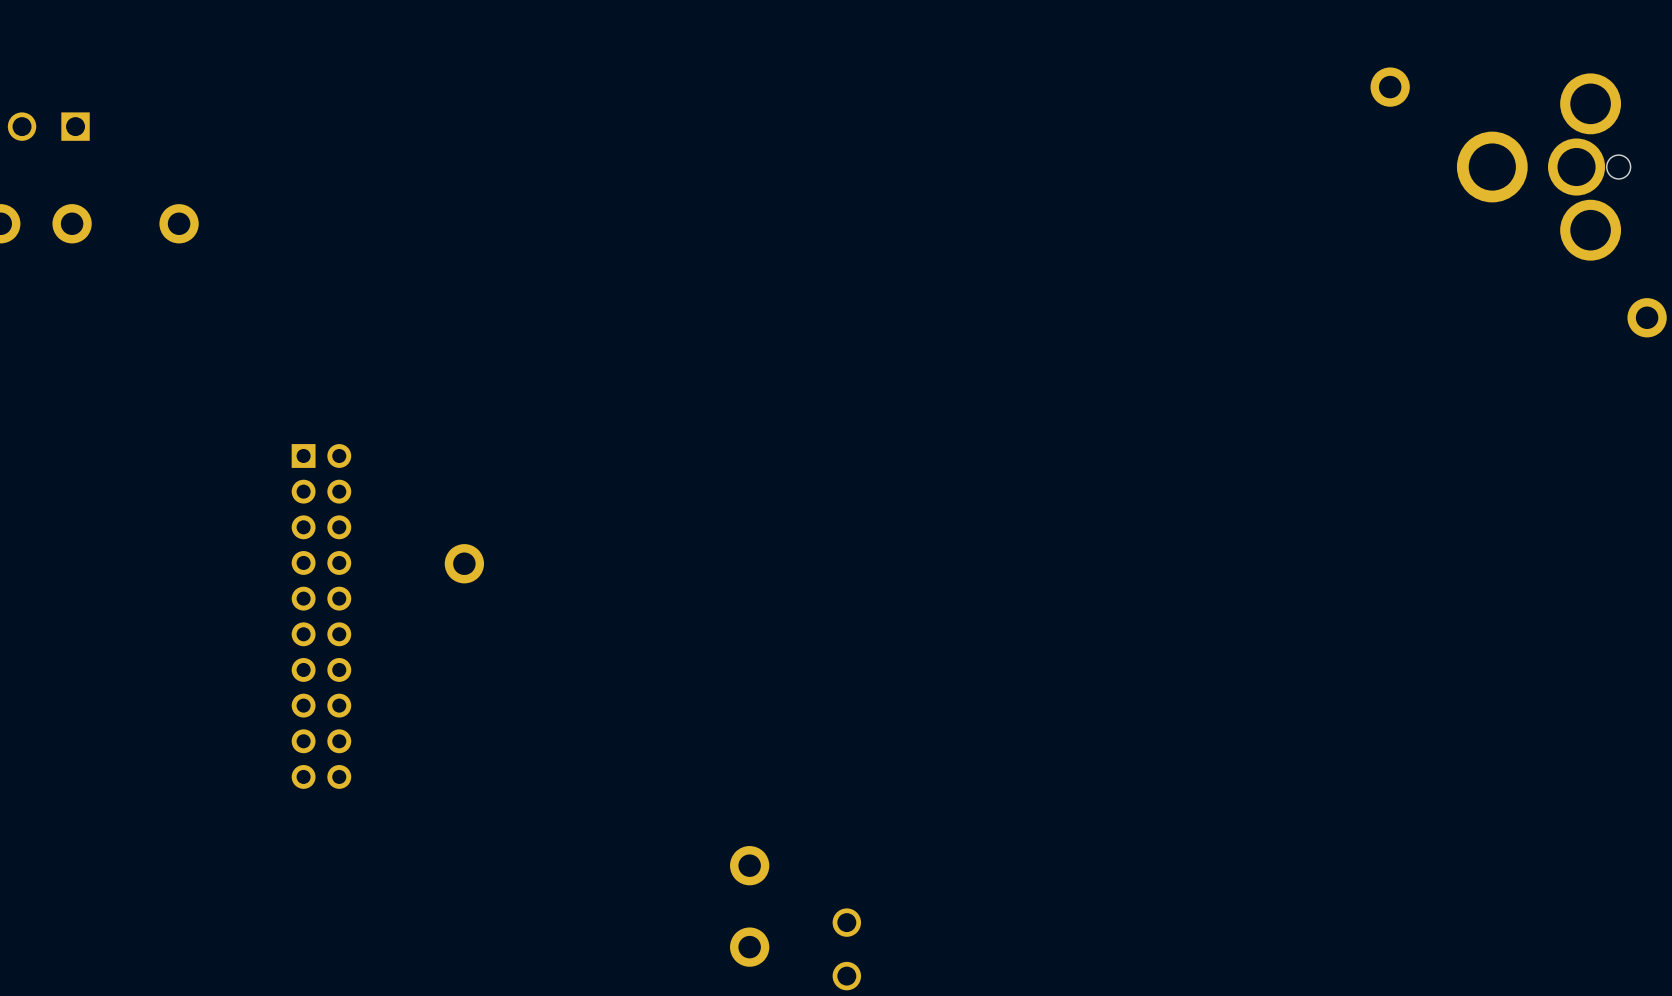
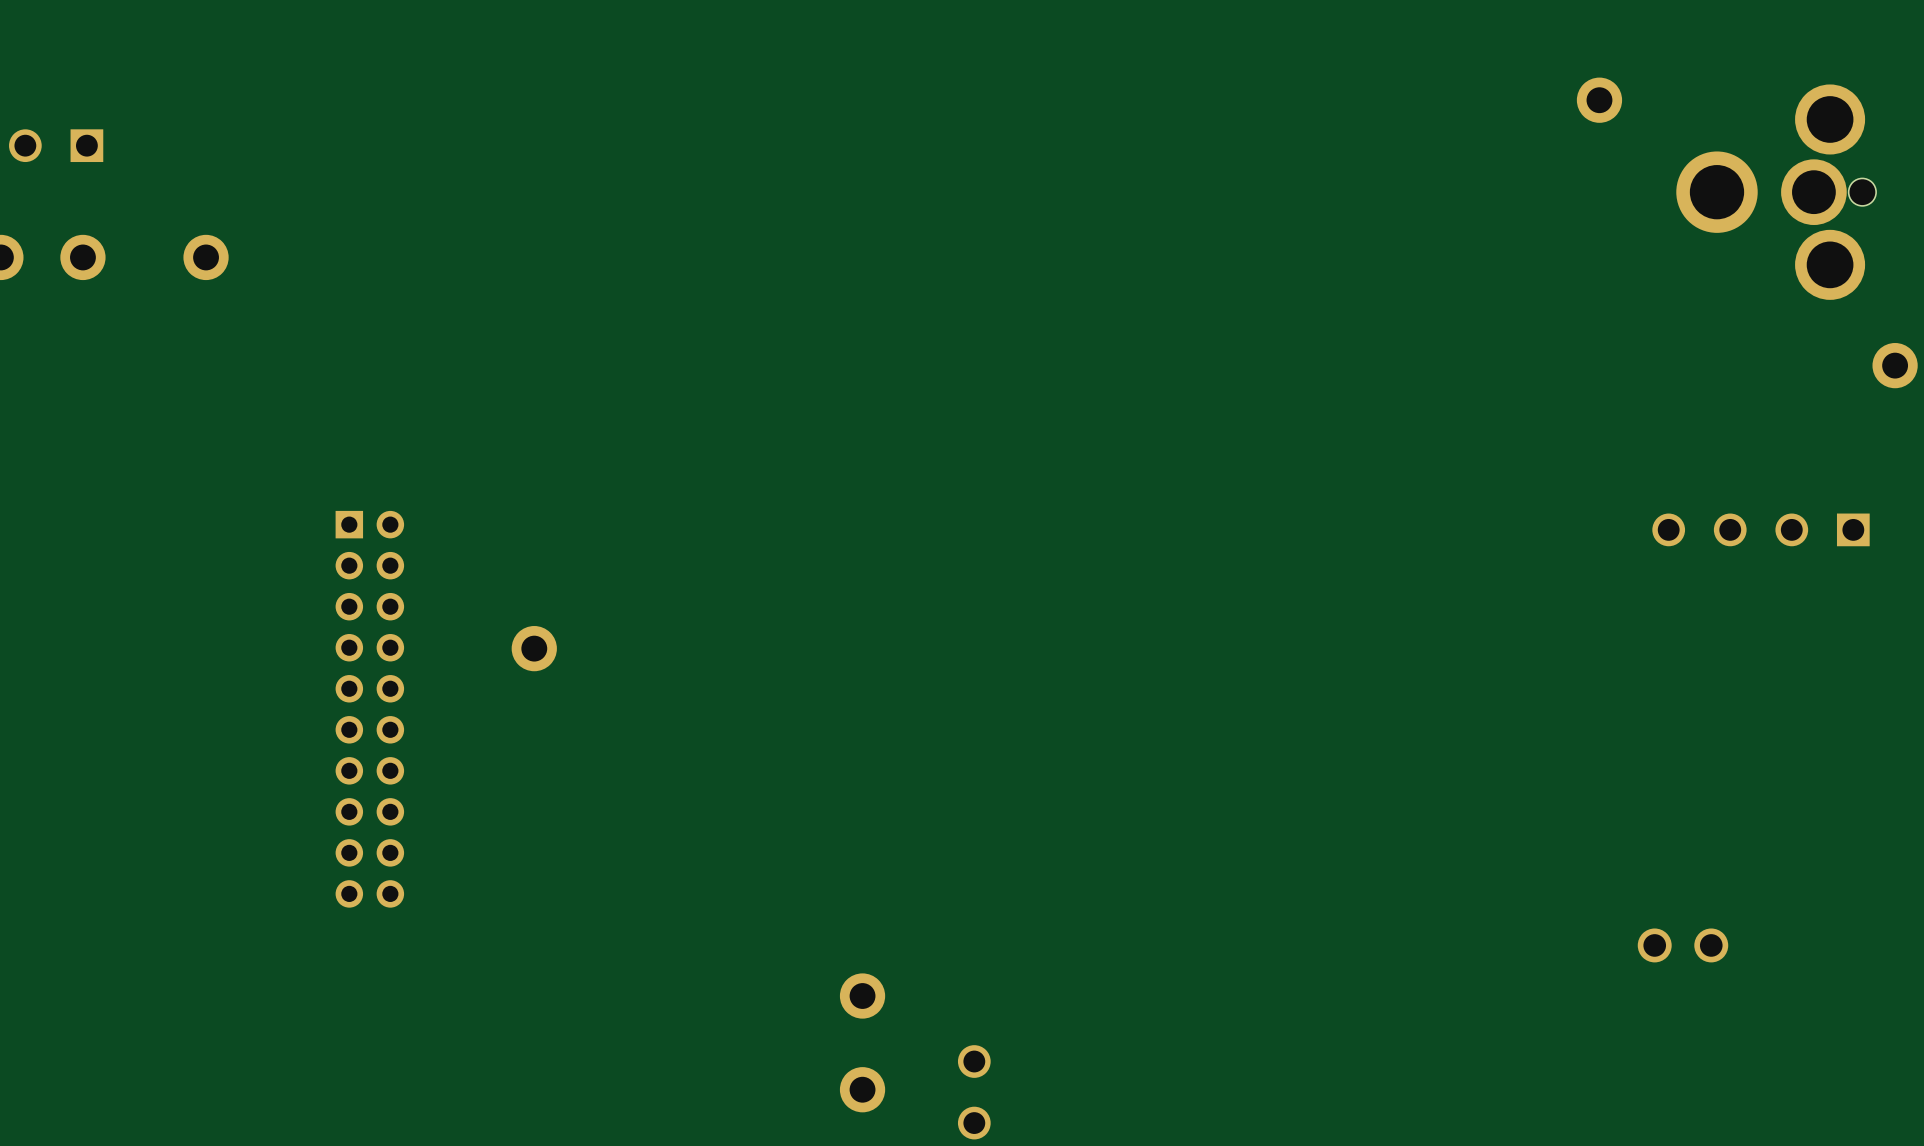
part: none -> (1761, 529)
part: none -> (1682, 945)

